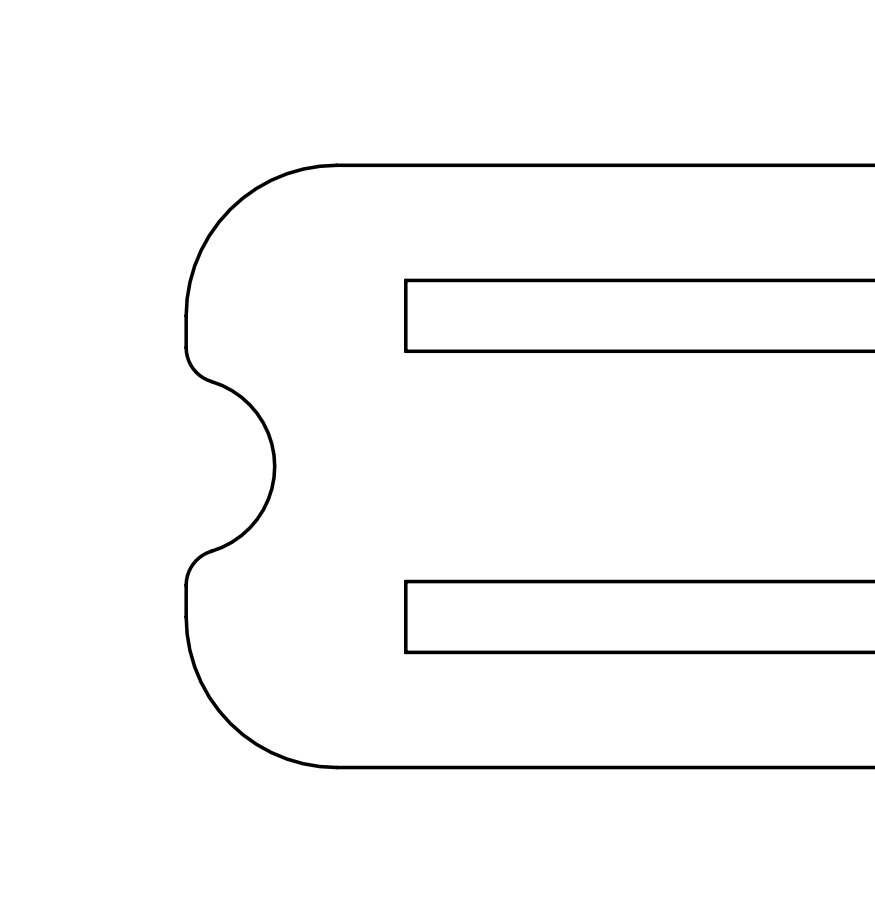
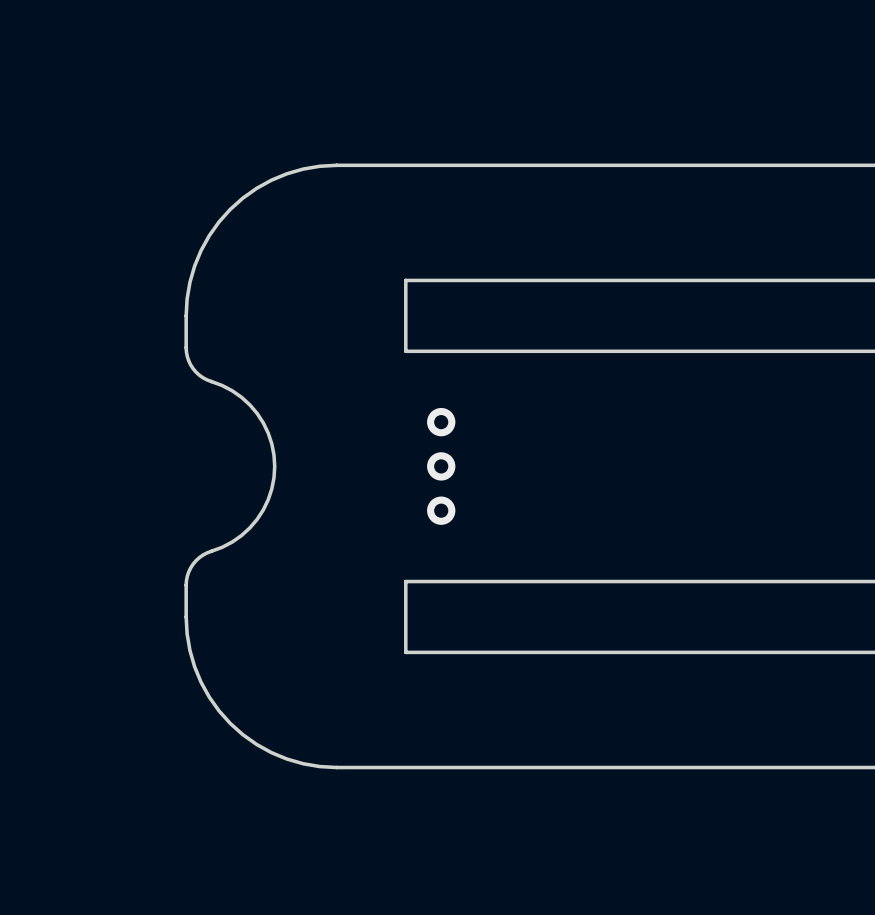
via: none -> (441, 422)
via: none -> (441, 466)
via: none -> (441, 510)

